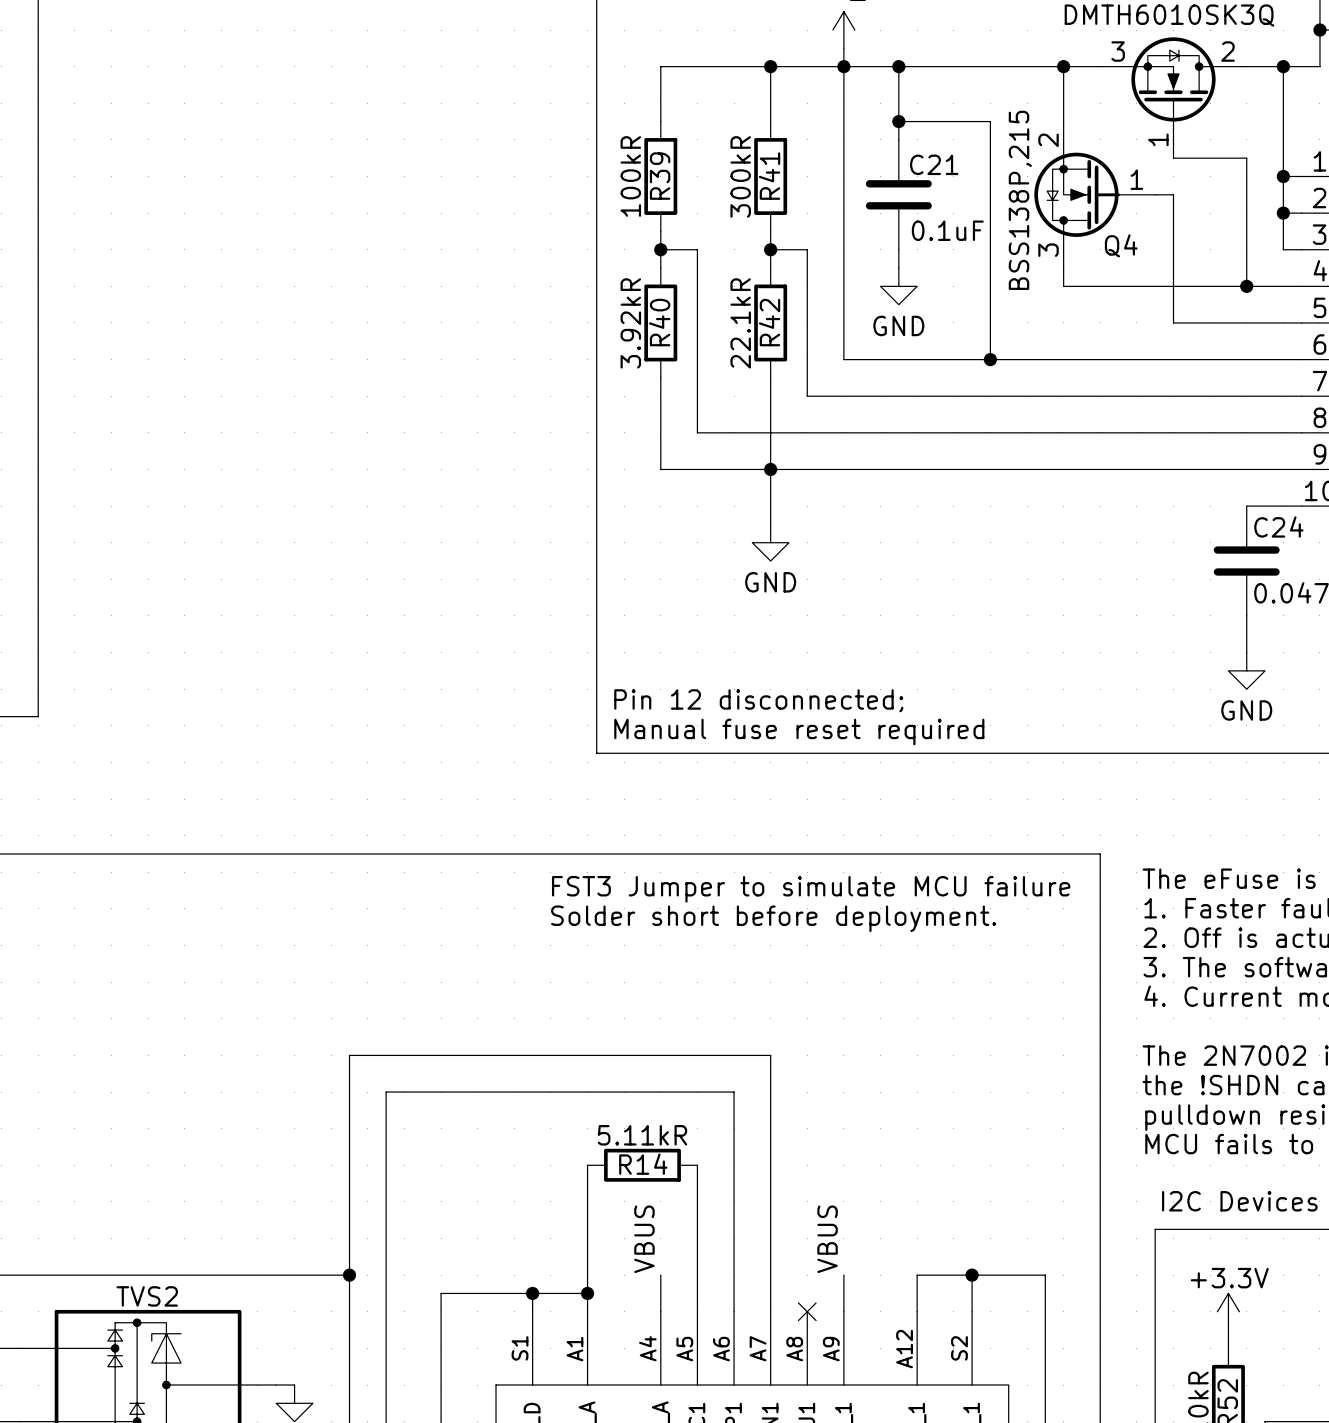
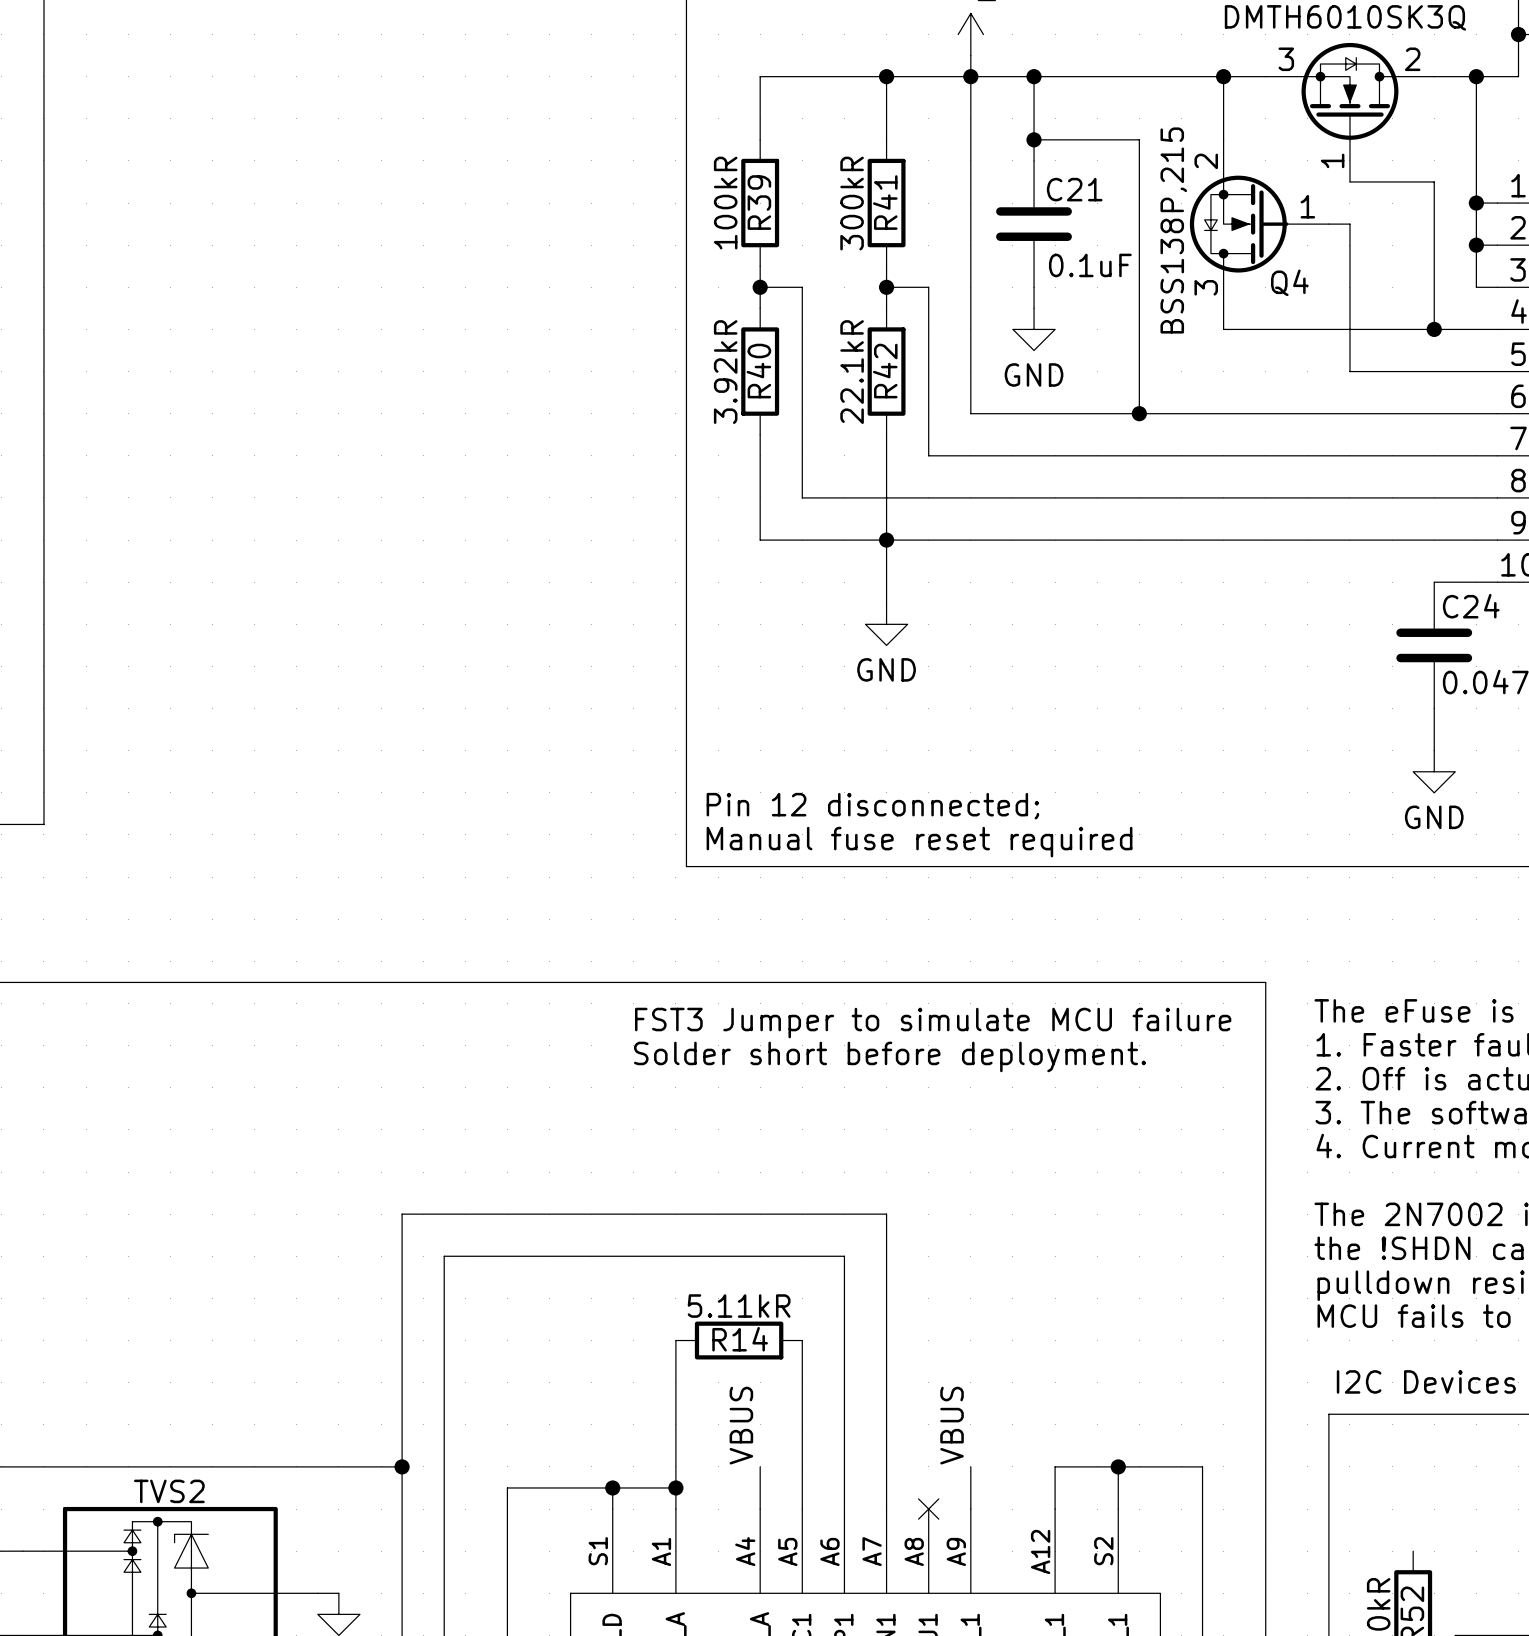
power symbol: +3.3V (1228, 1311) -> none
wire: (1228, 1330) (1228, 1348) -> none

